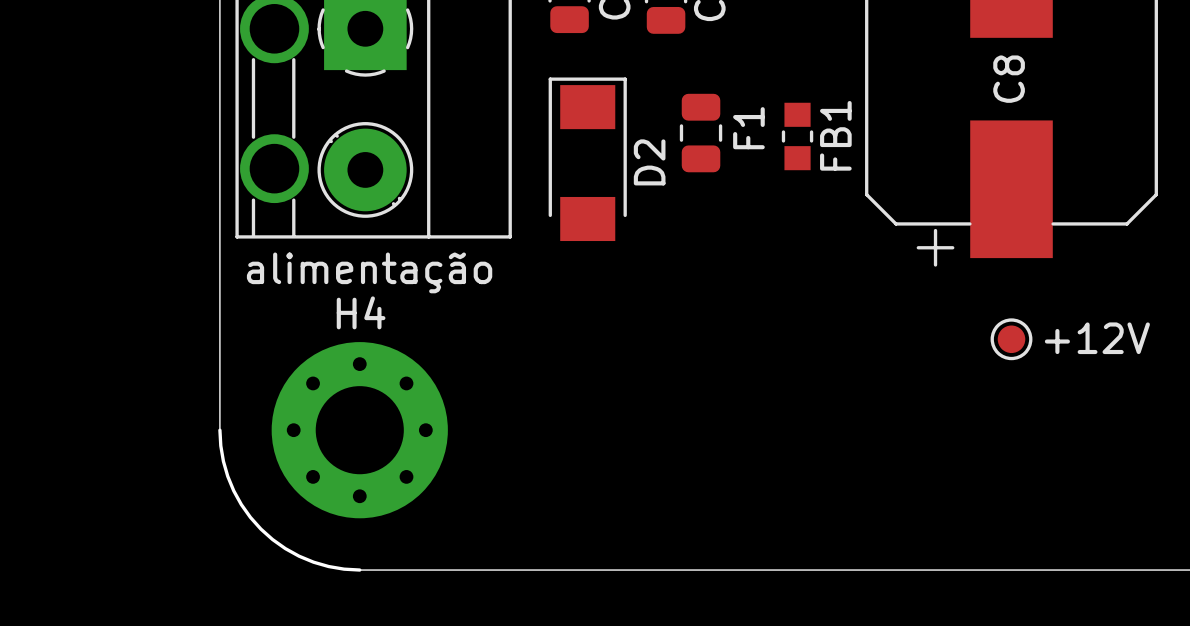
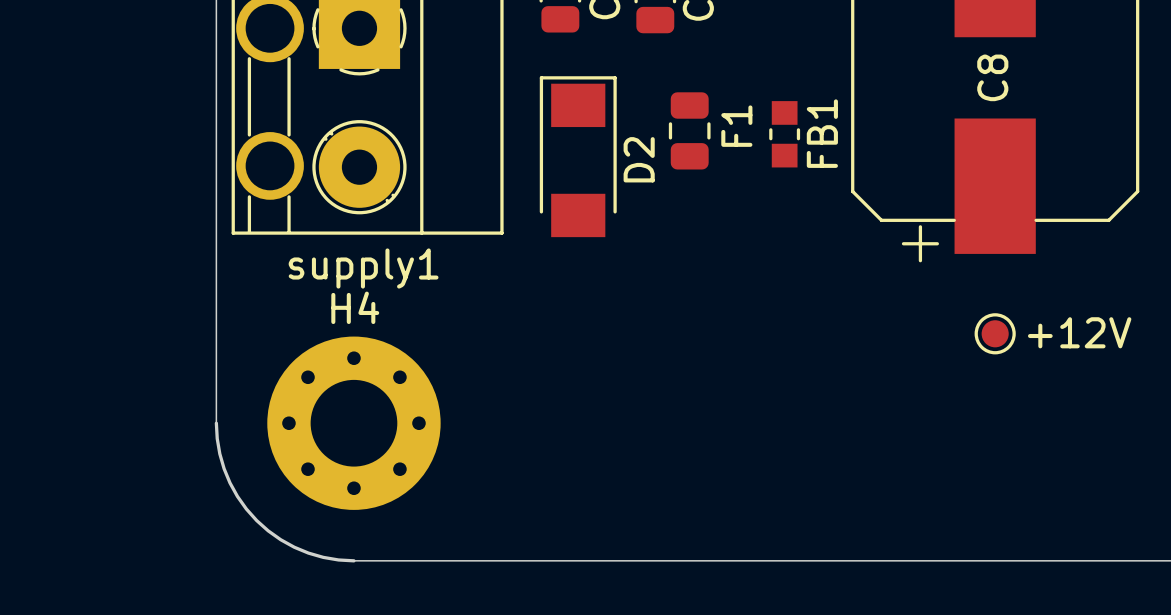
alimentação name: alimentação (369, 272) -> supply1 (363, 268)

